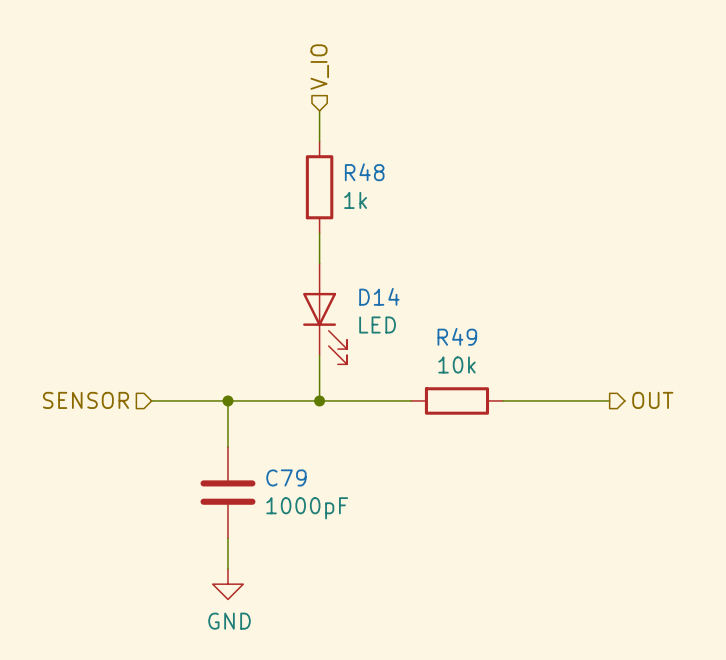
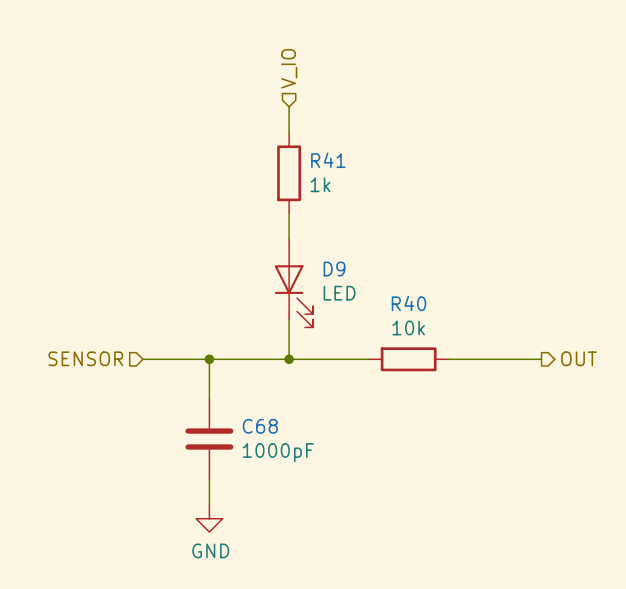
R48 name: R48 (364, 172) -> R41 (328, 160)
D14 name: D14 (379, 296) -> D9 (334, 269)
R49 name: R49 (457, 336) -> R40 (408, 303)
C79 name: C79 (286, 477) -> C68 (260, 426)

